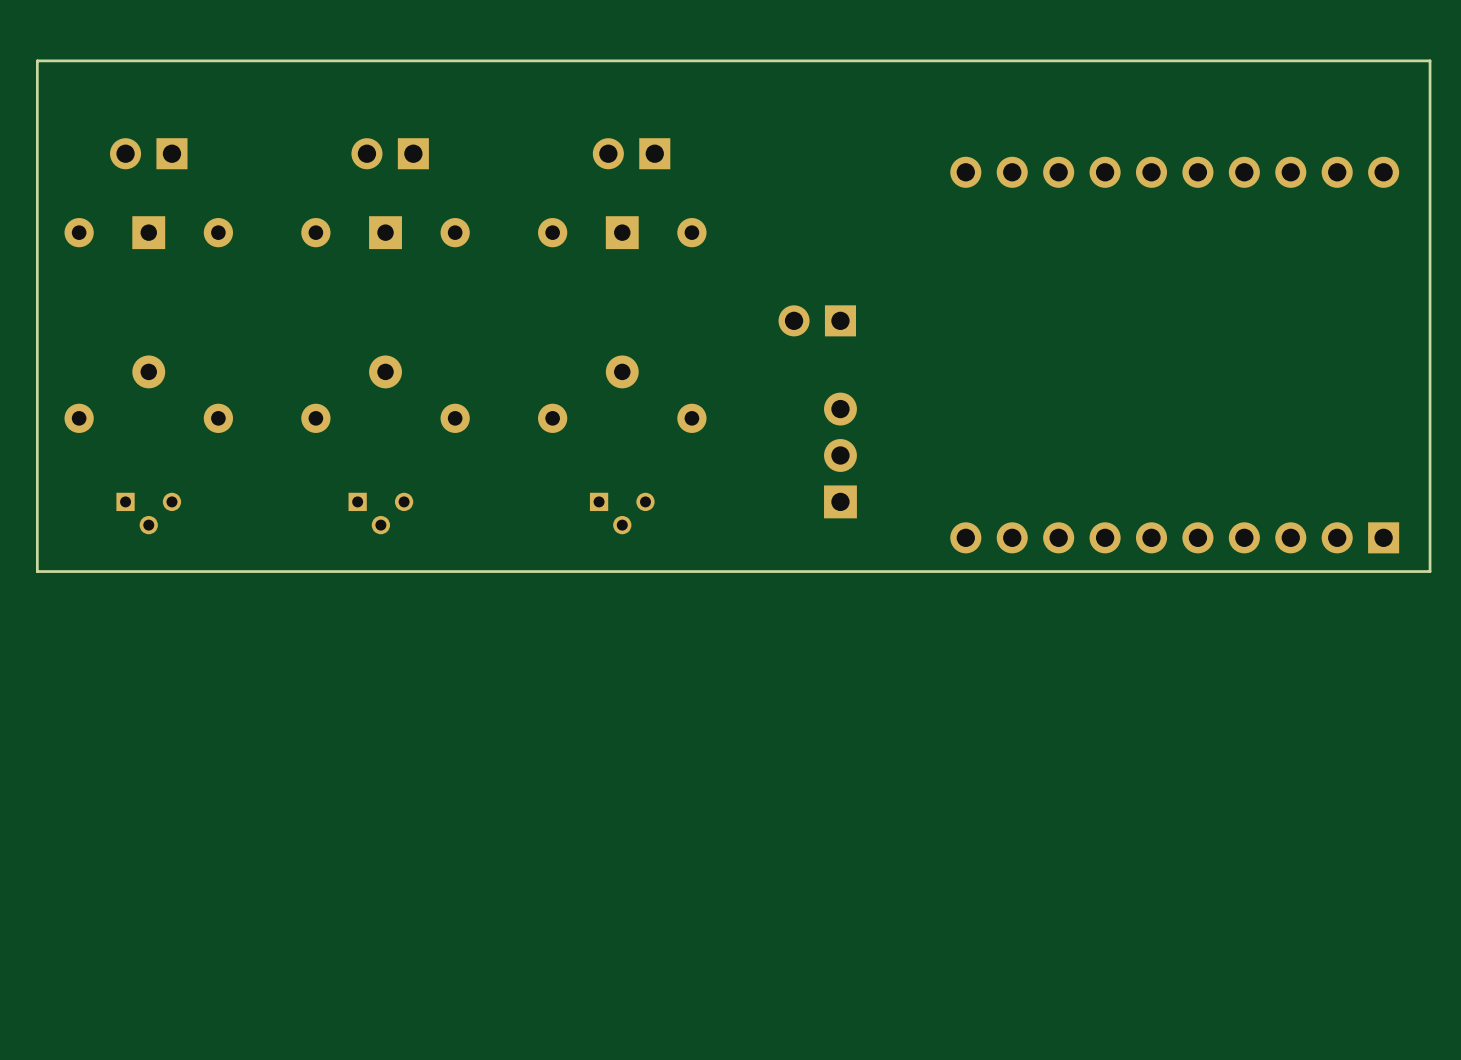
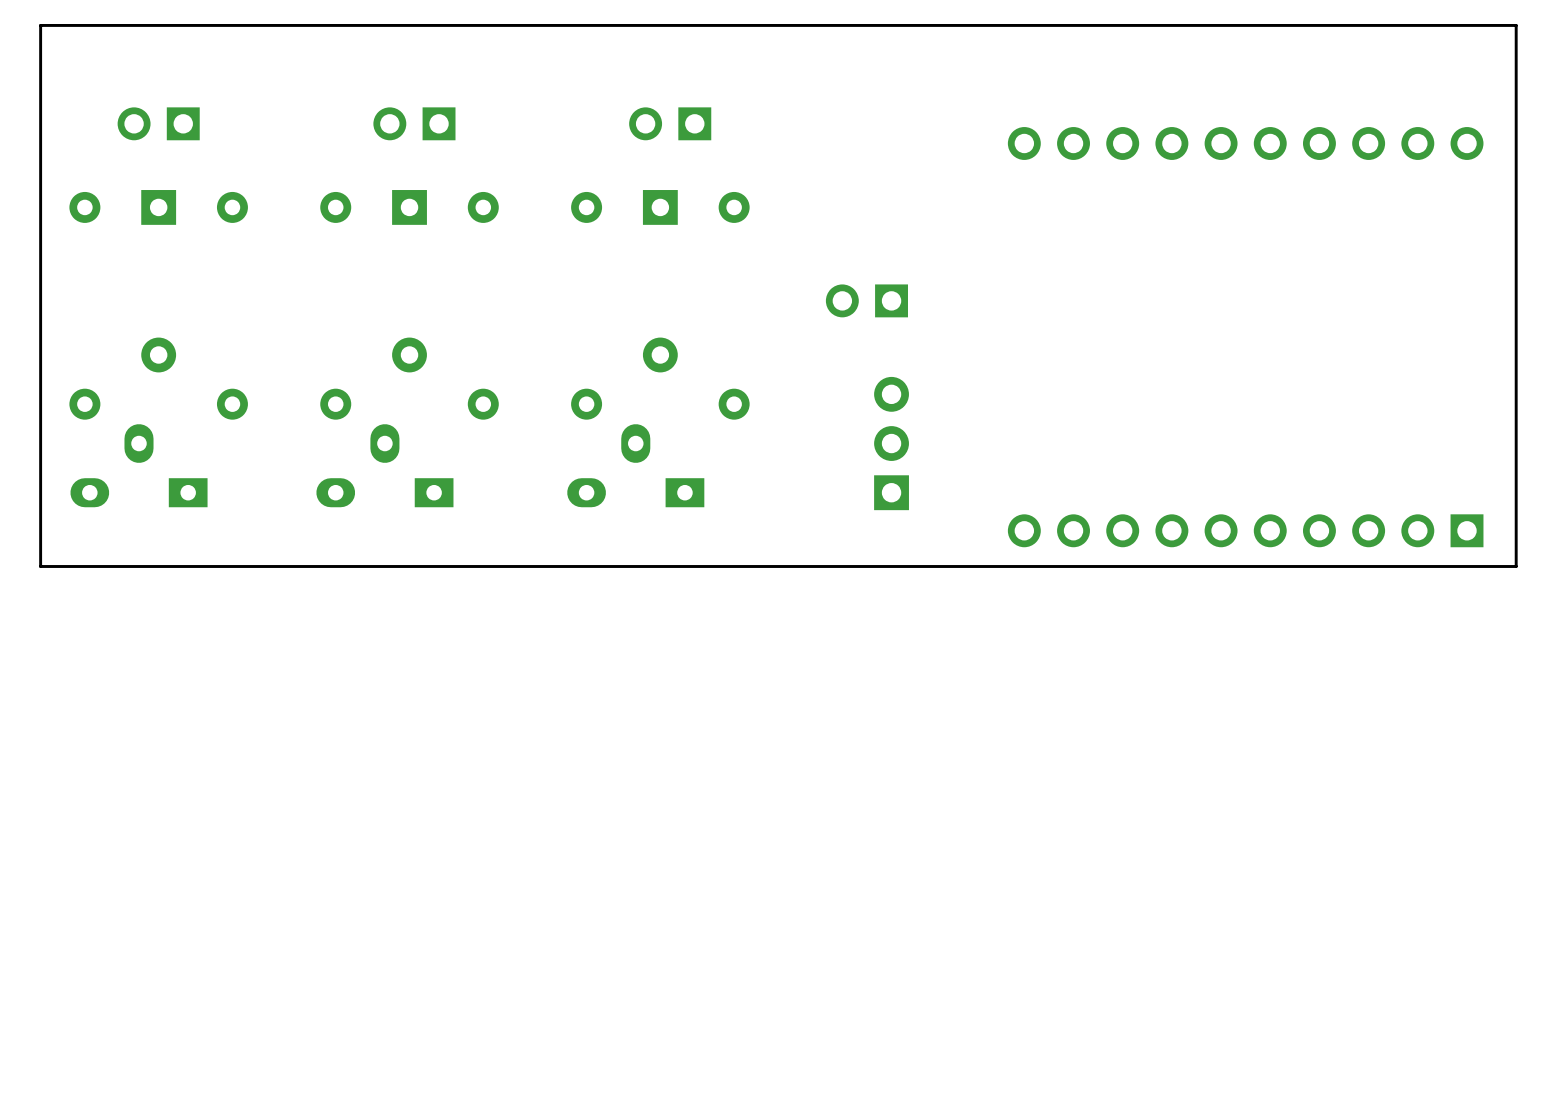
part: none -> (139, 465)
part: none -> (384, 465)
part: none -> (635, 465)
part: (148, 513) -> none
part: (380, 513) -> none
part: (622, 513) -> none

